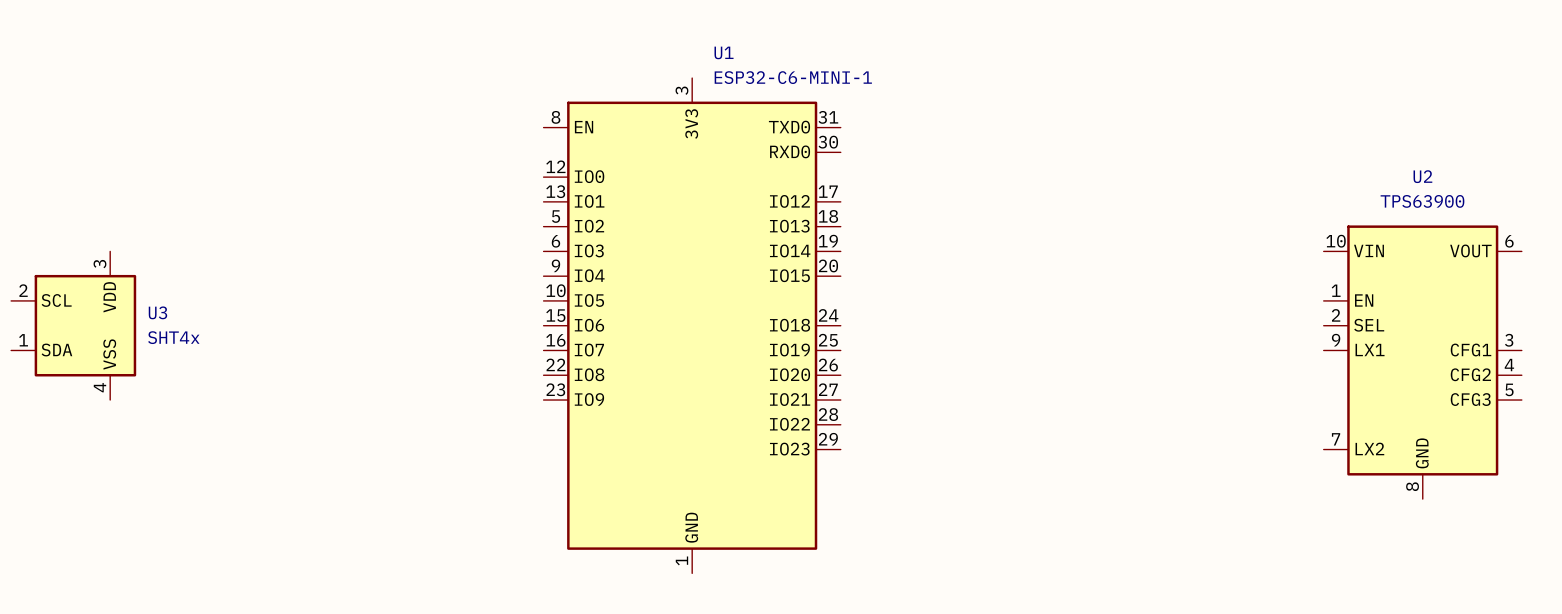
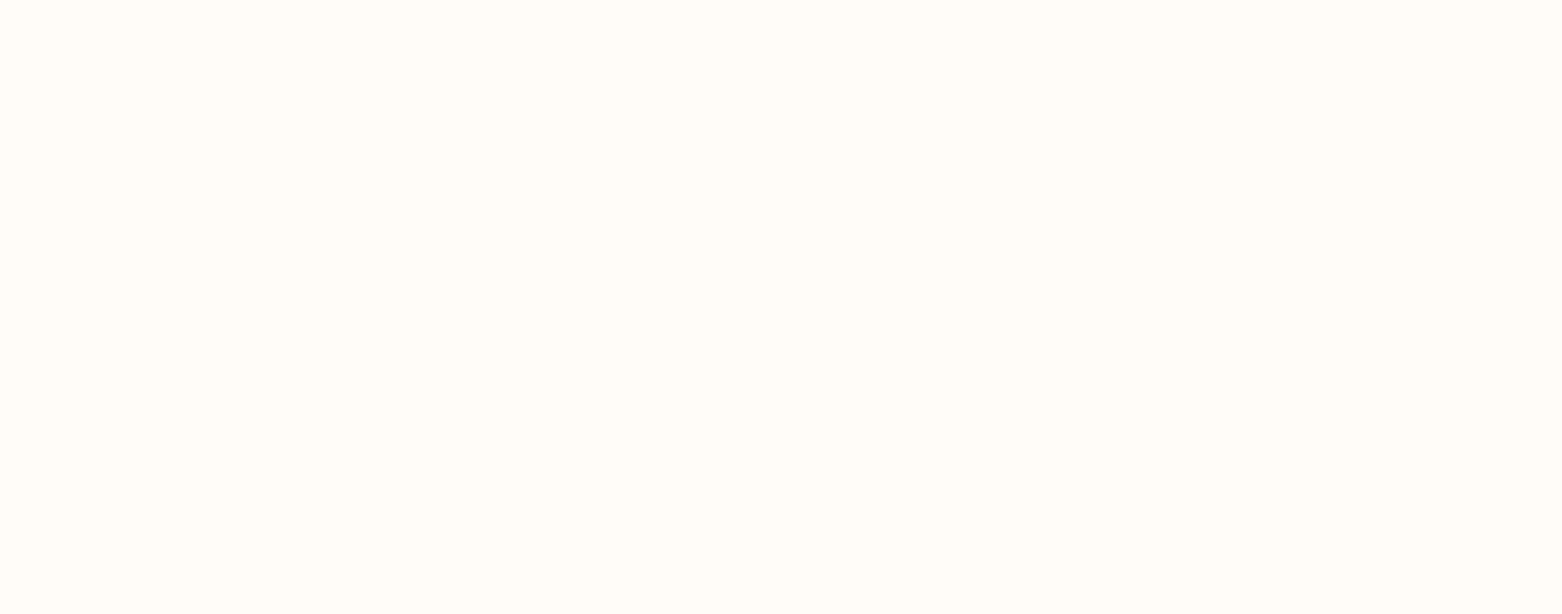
U3: SHT4x (73, 325) -> none
U1: ESP32-C6-MINI-1 (692, 325) -> none
U2: TPS63900 (1422, 362) -> none

